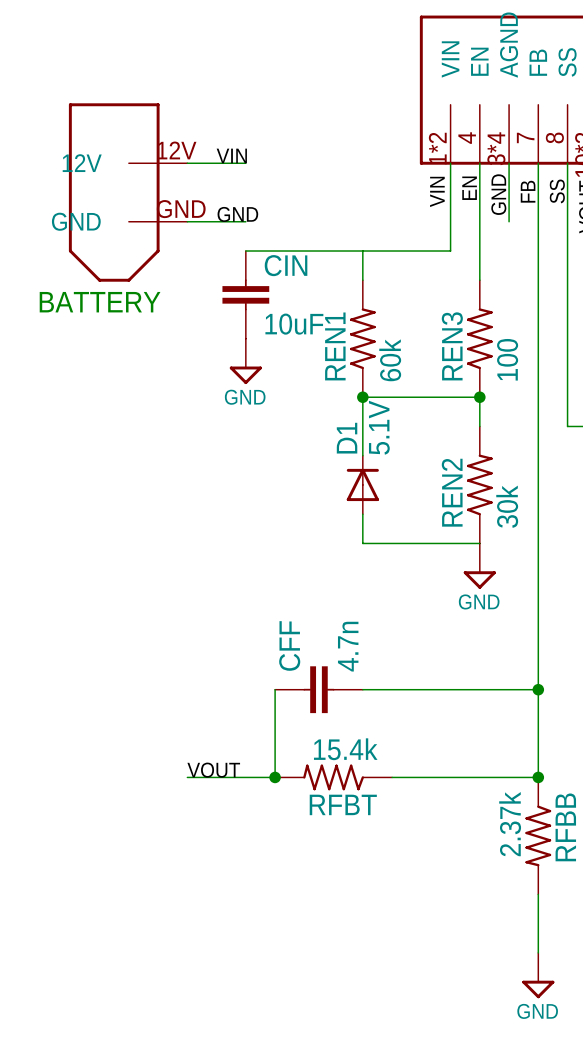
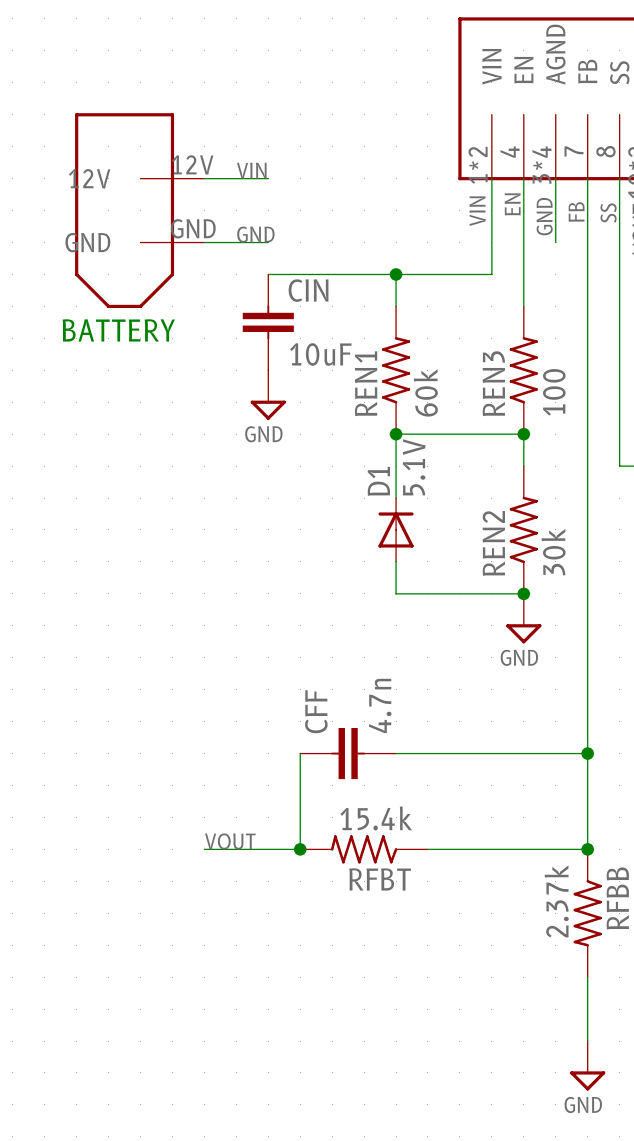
junction: none -> (396, 274)
junction: none -> (523, 593)

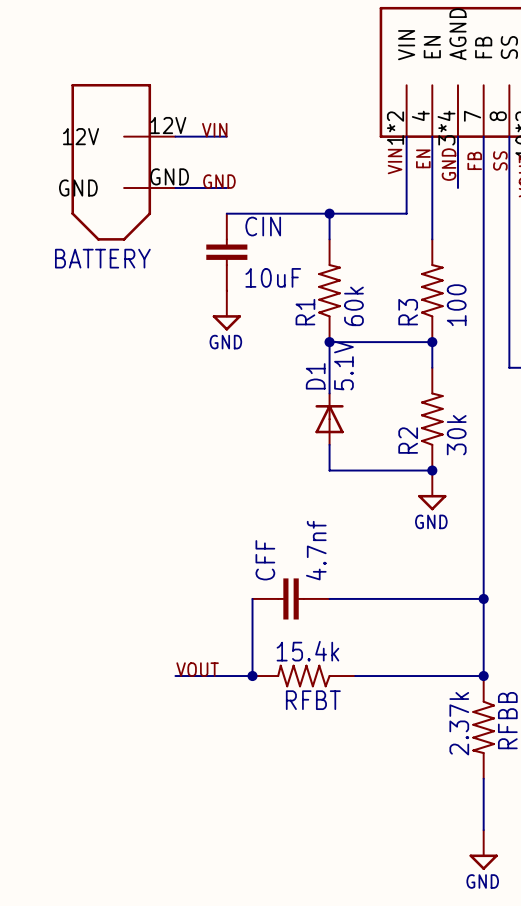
REN1 name: REN1 (366, 383) -> R1 (305, 312)
REN3 name: REN3 (493, 383) -> R3 (408, 312)
REN2 name: REN2 (493, 543) -> R2 (408, 440)
CFF value: 4.7n (380, 705) -> 4.7nf (316, 550)

